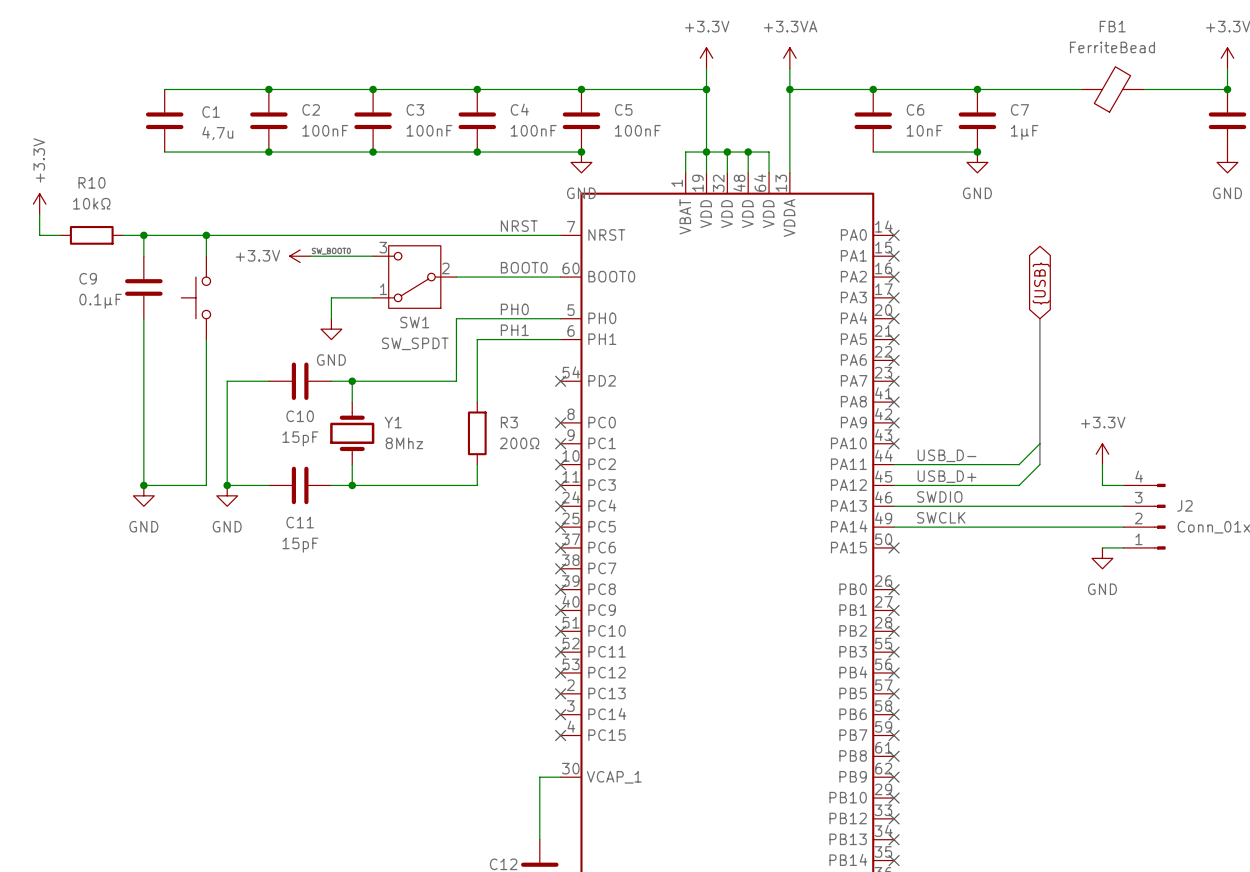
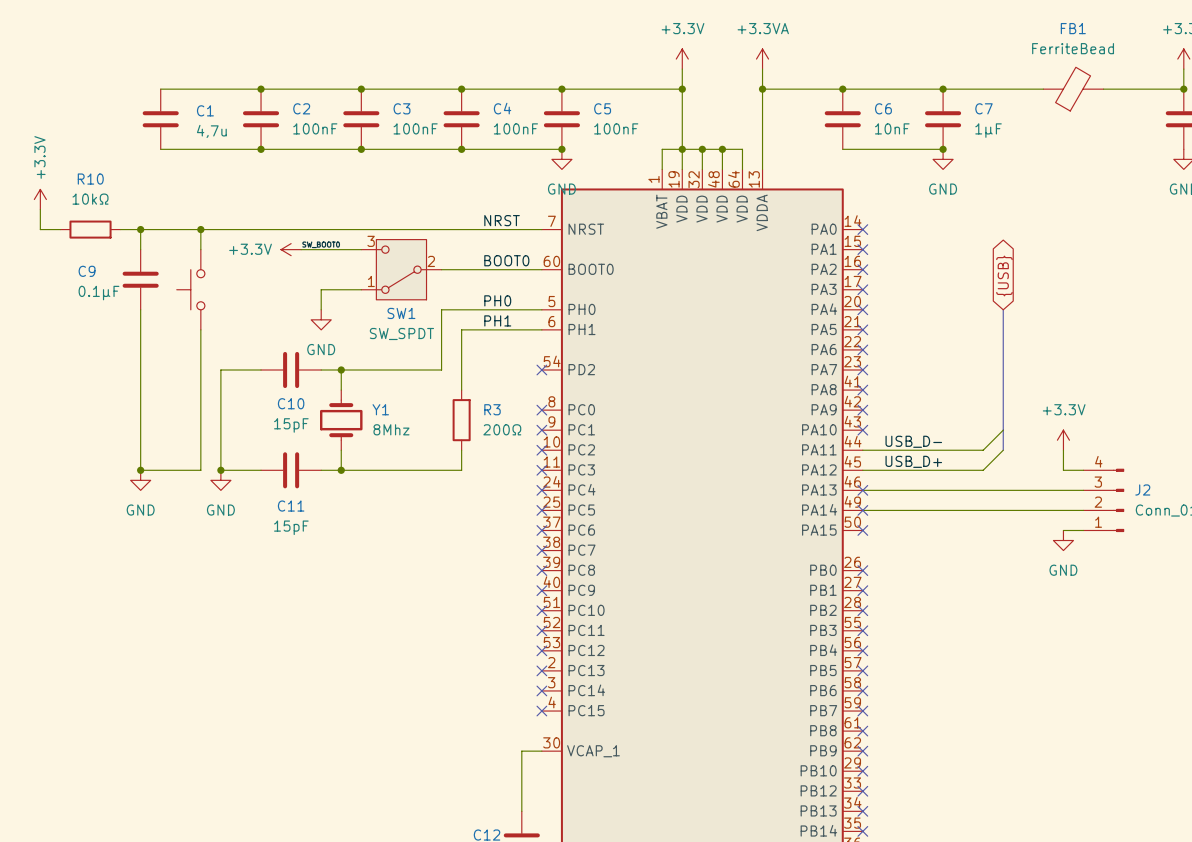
label: SWDIO (939, 496) -> none
no-connect mark: none -> (862, 490)
label: SWCLK (941, 517) -> none
no-connect mark: none -> (862, 510)

